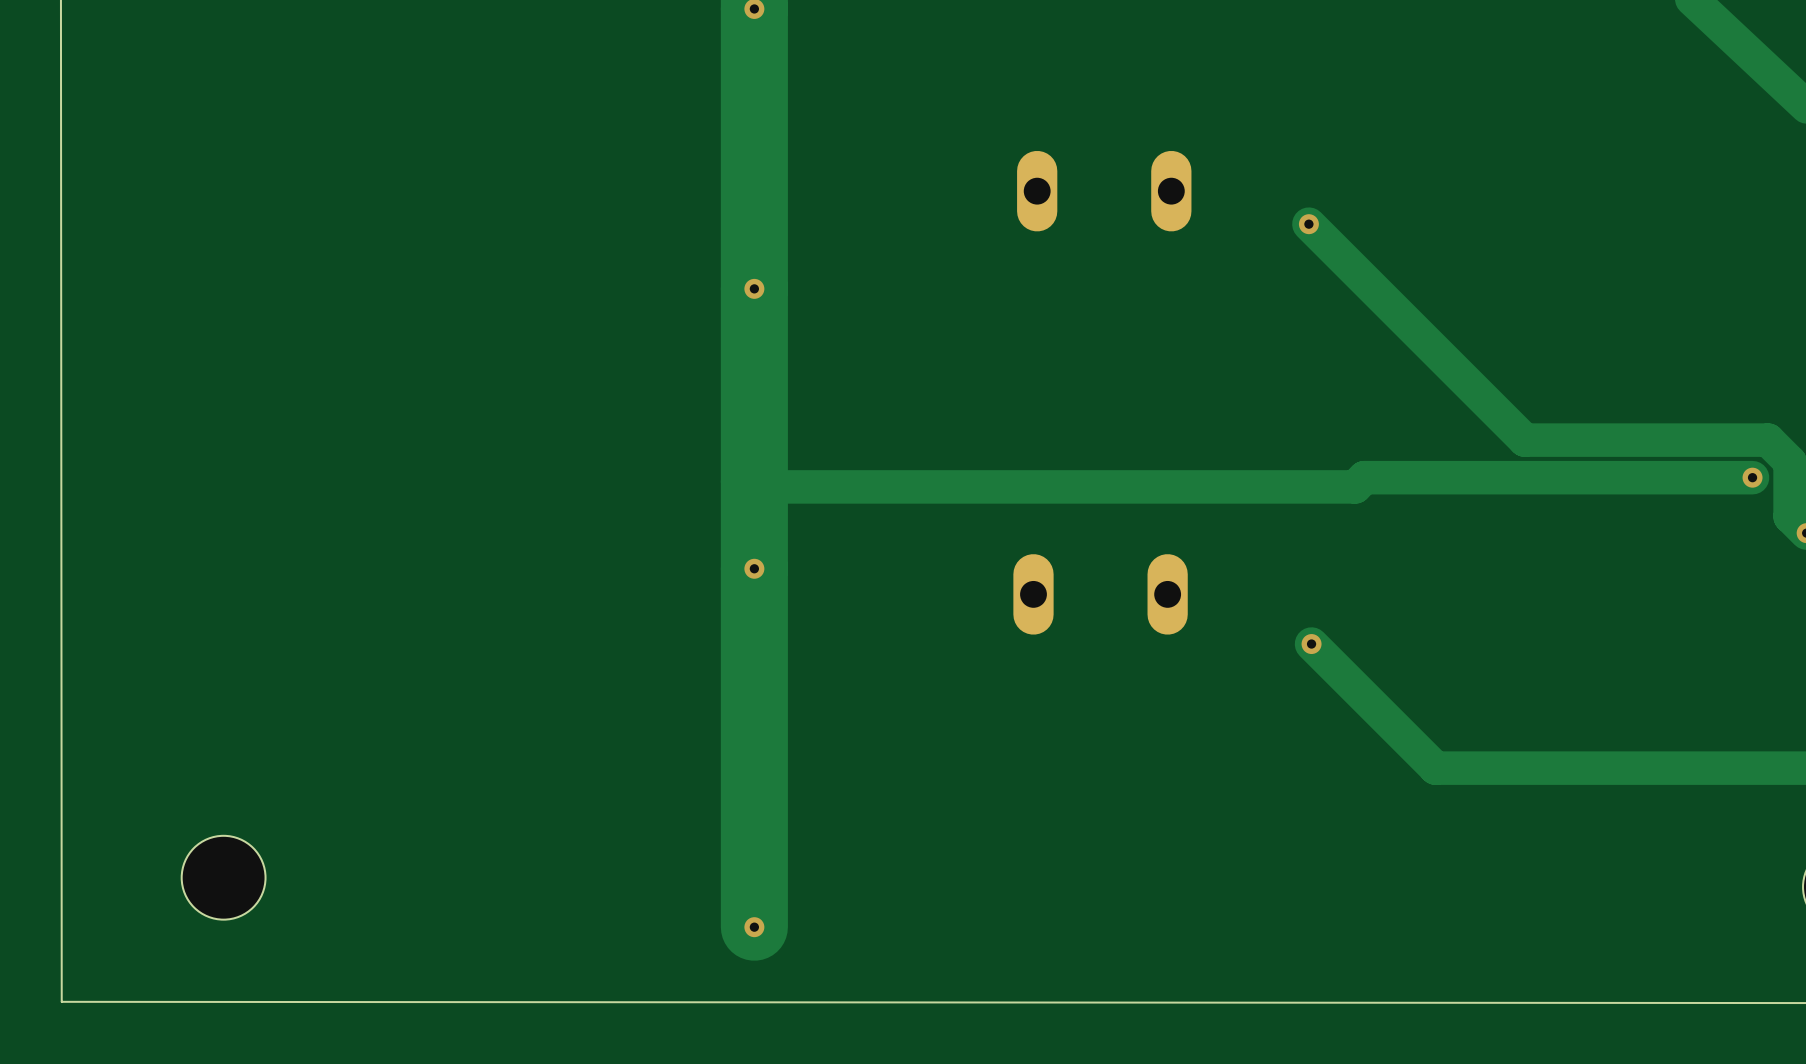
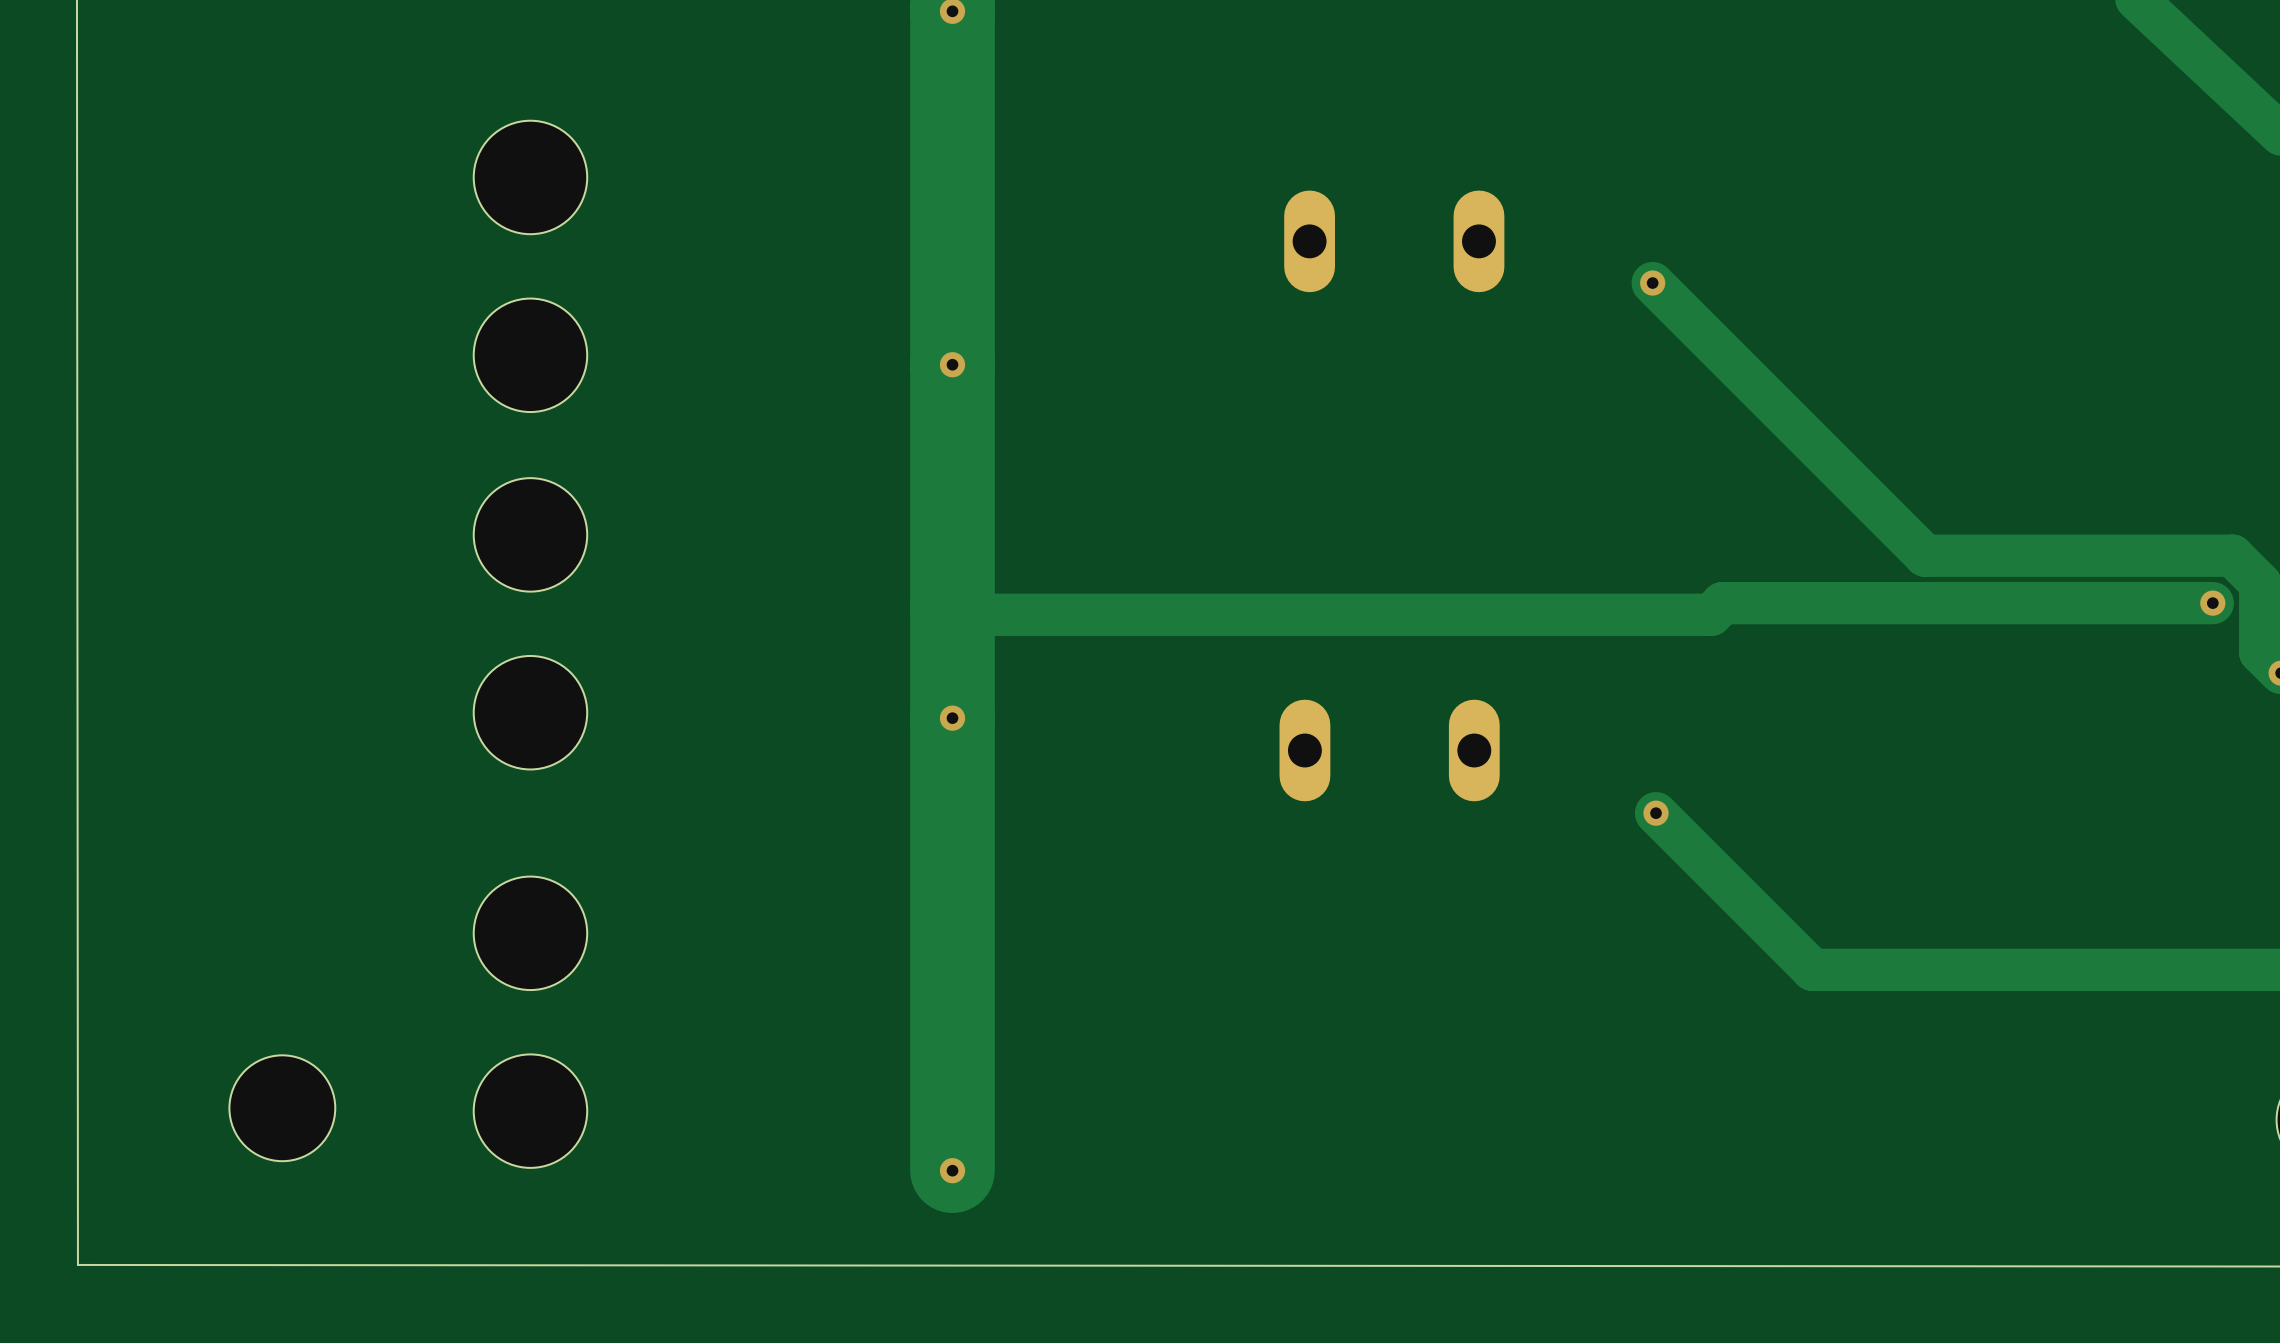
part: none -> (530, 266)
part: none -> (530, 623)
part: none -> (530, 1022)

